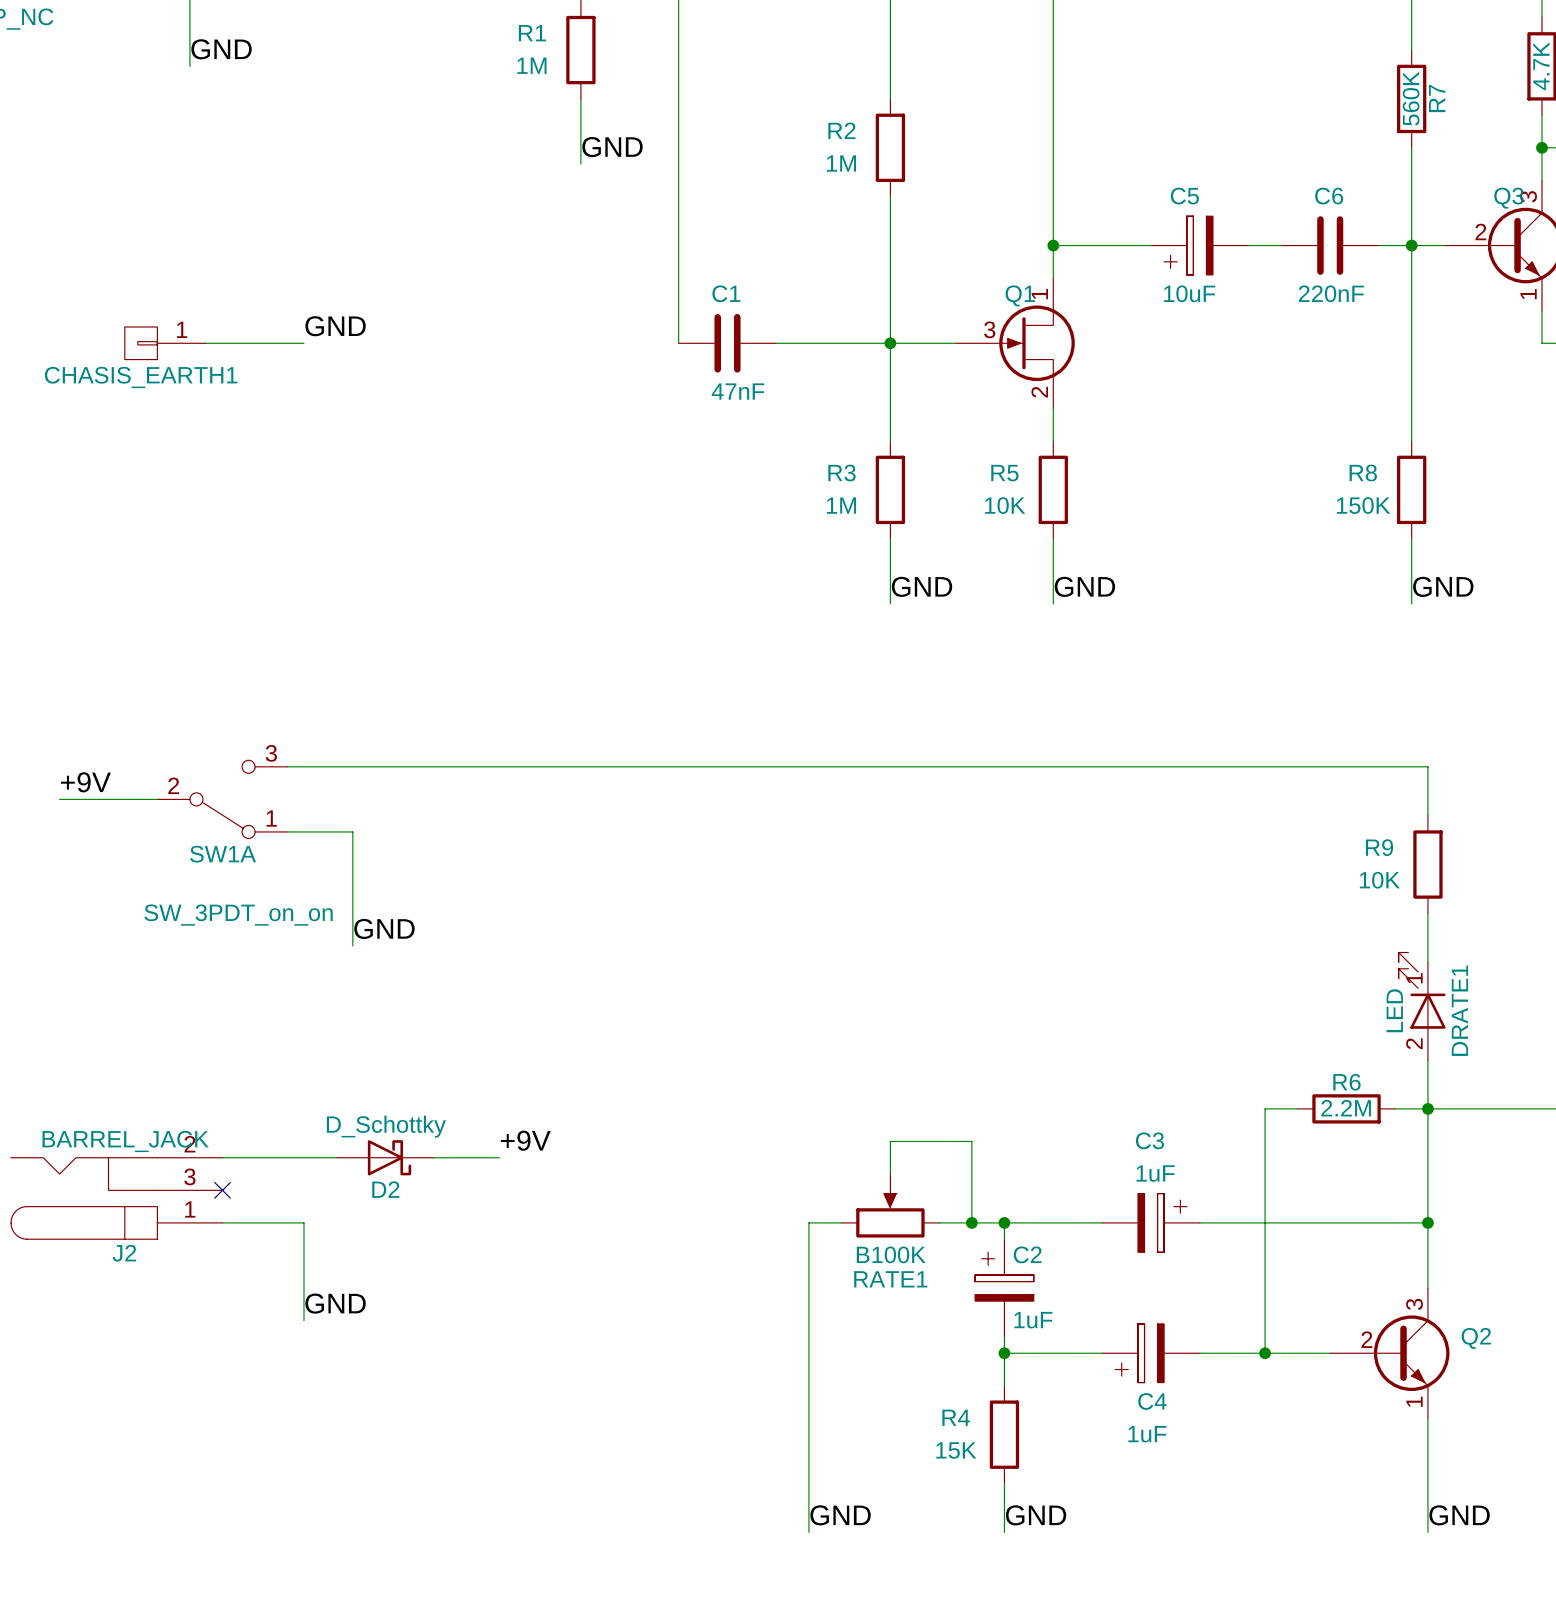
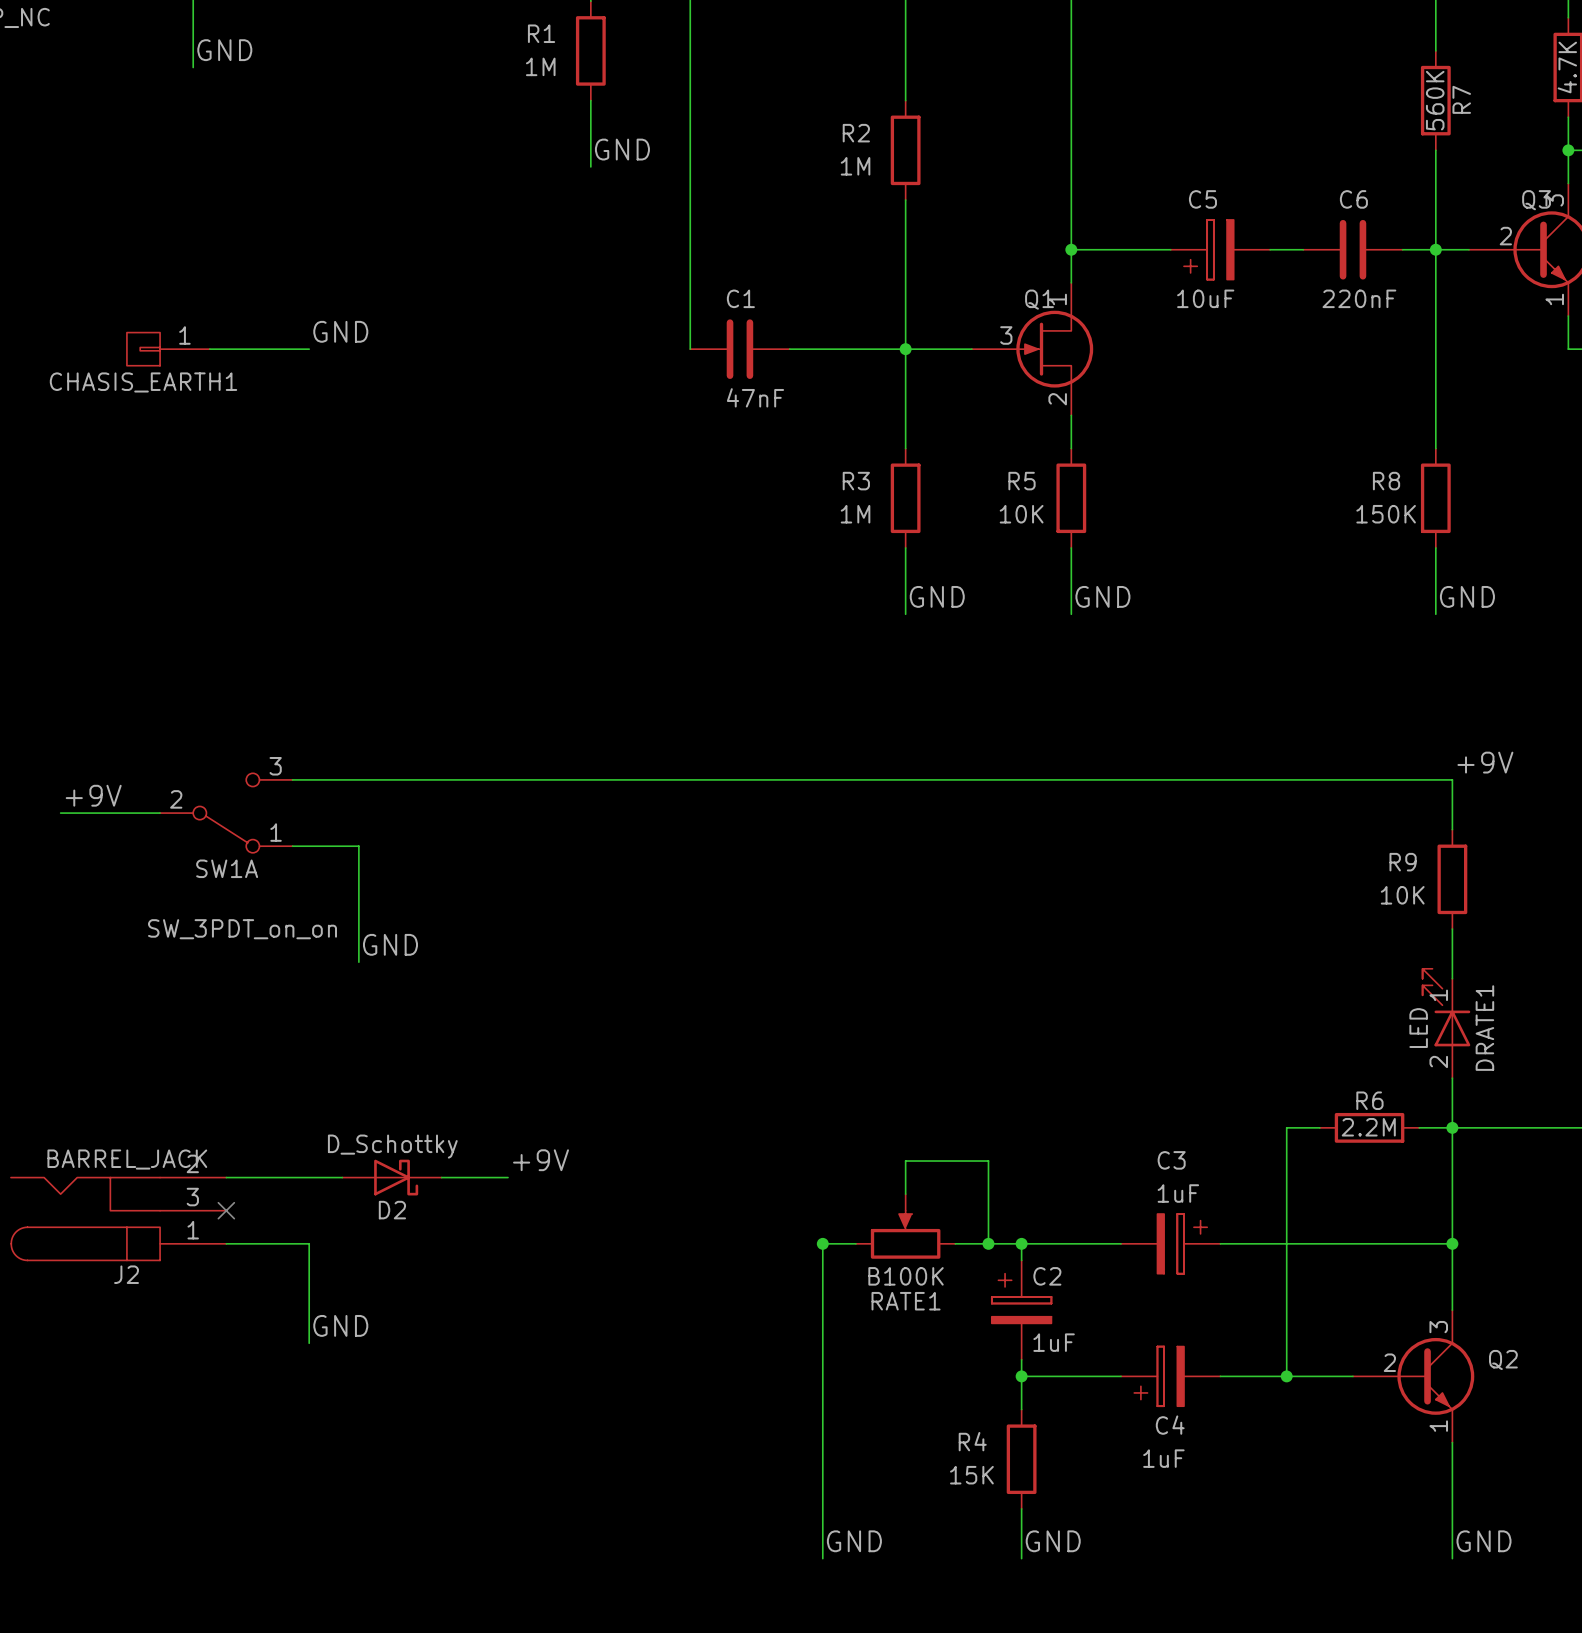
label: none -> +9V (1485, 762)
junction: none -> (822, 1243)

